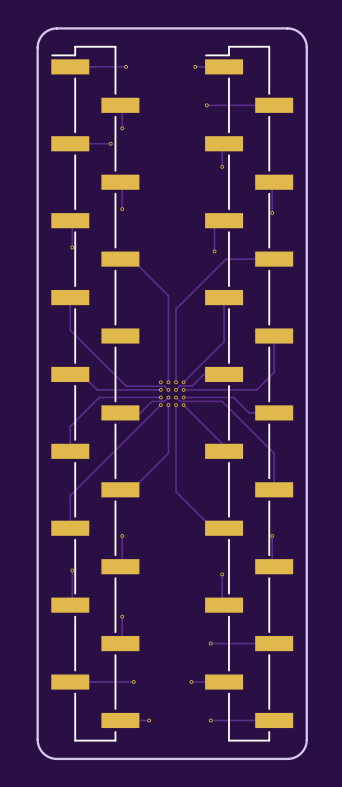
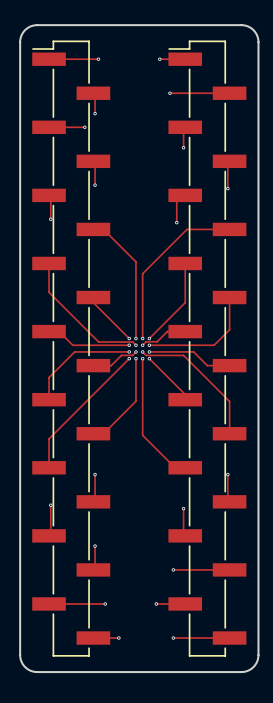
track: none -> (93, 297) (93, 302) (129, 338)

